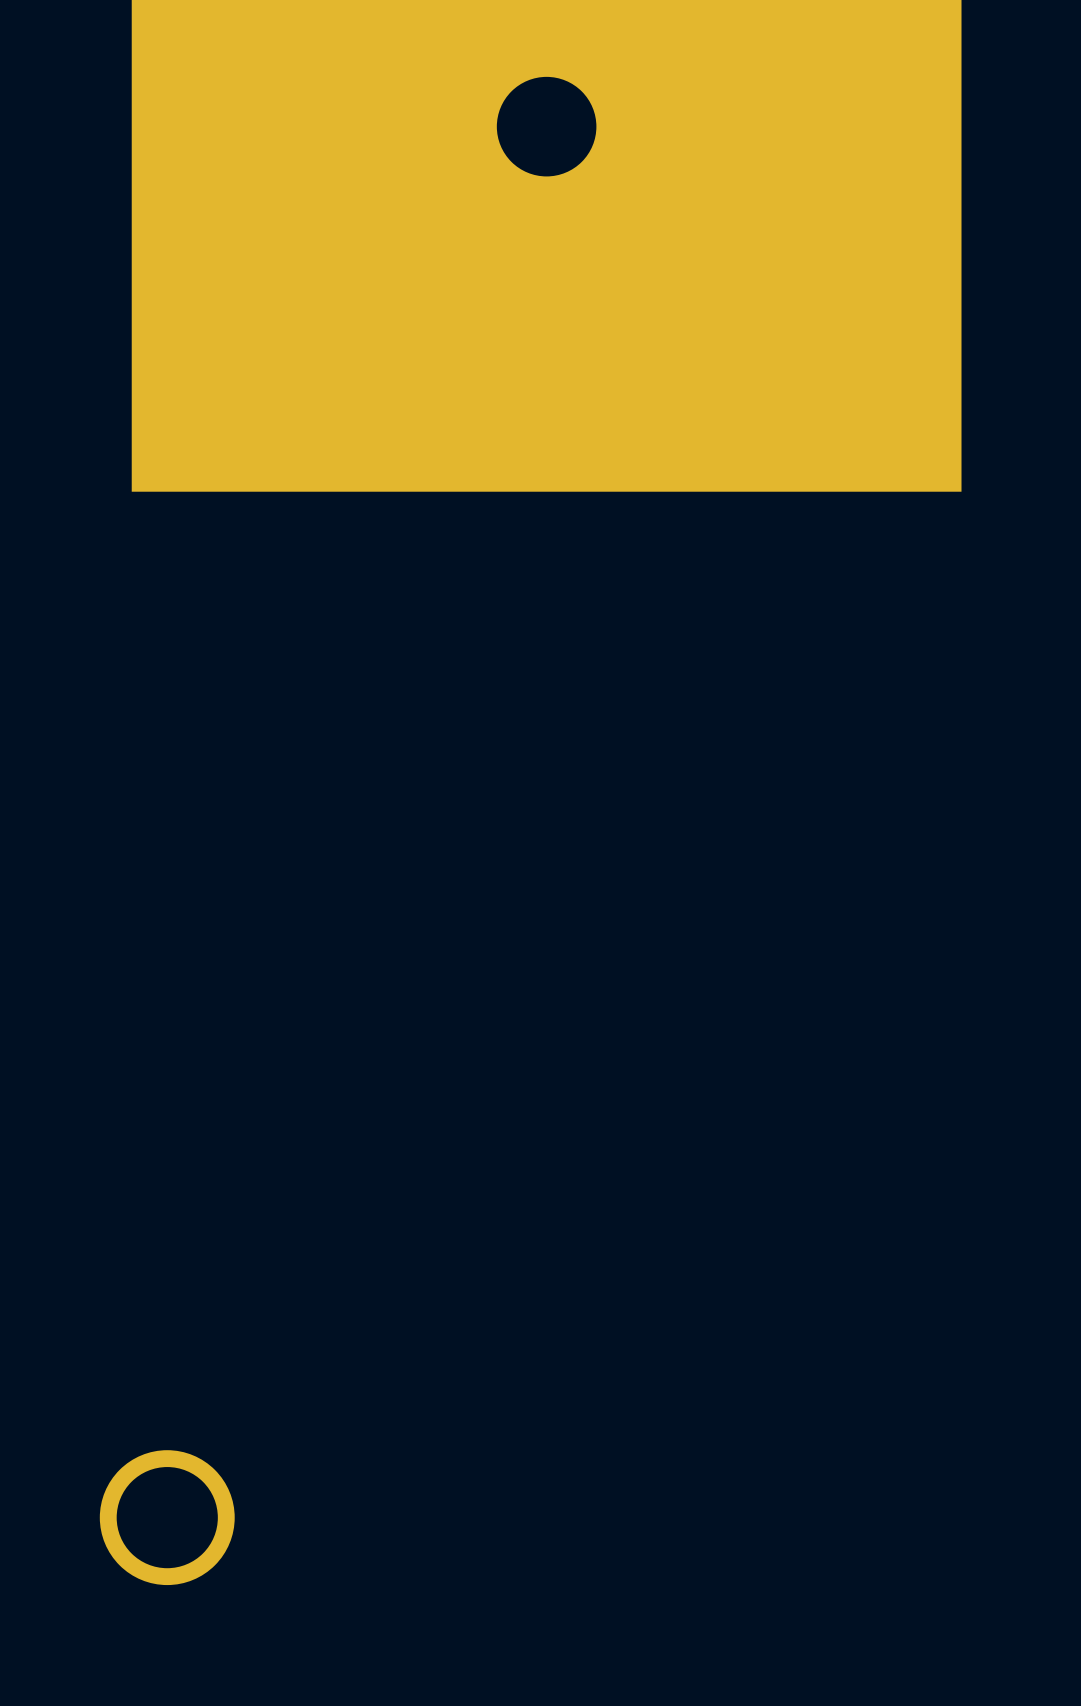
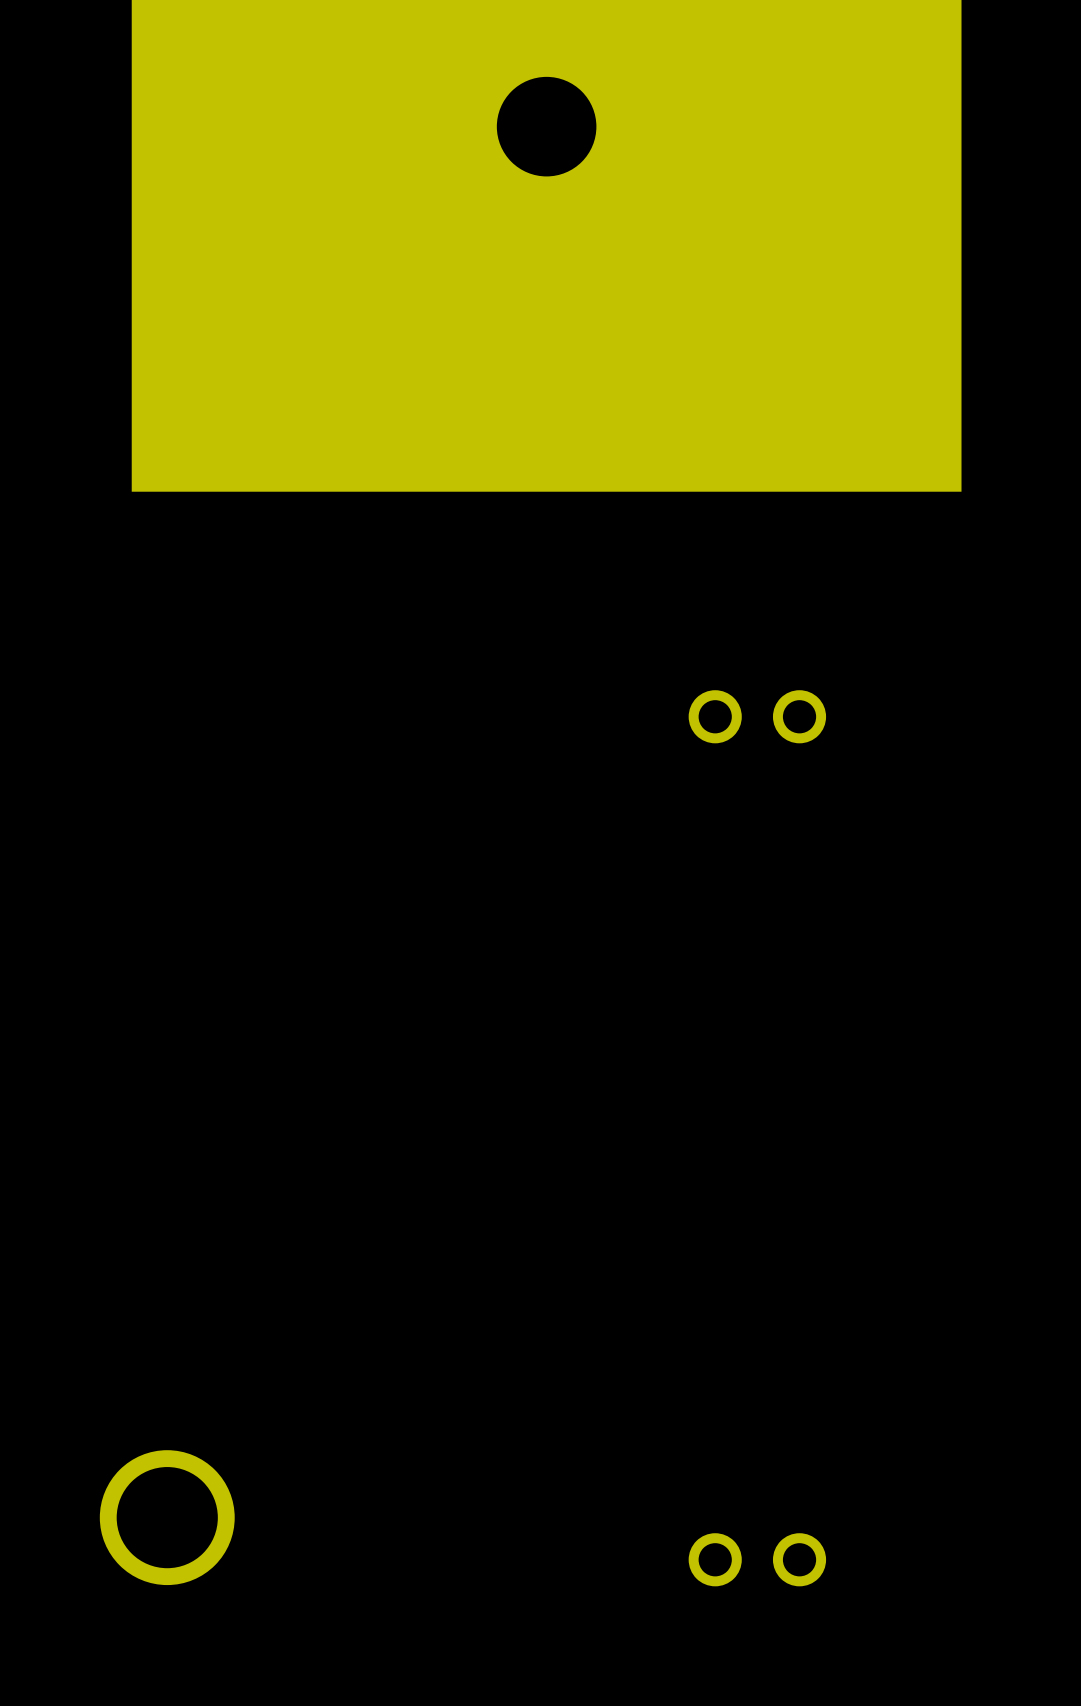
part: none -> (757, 716)
part: none -> (757, 1559)

